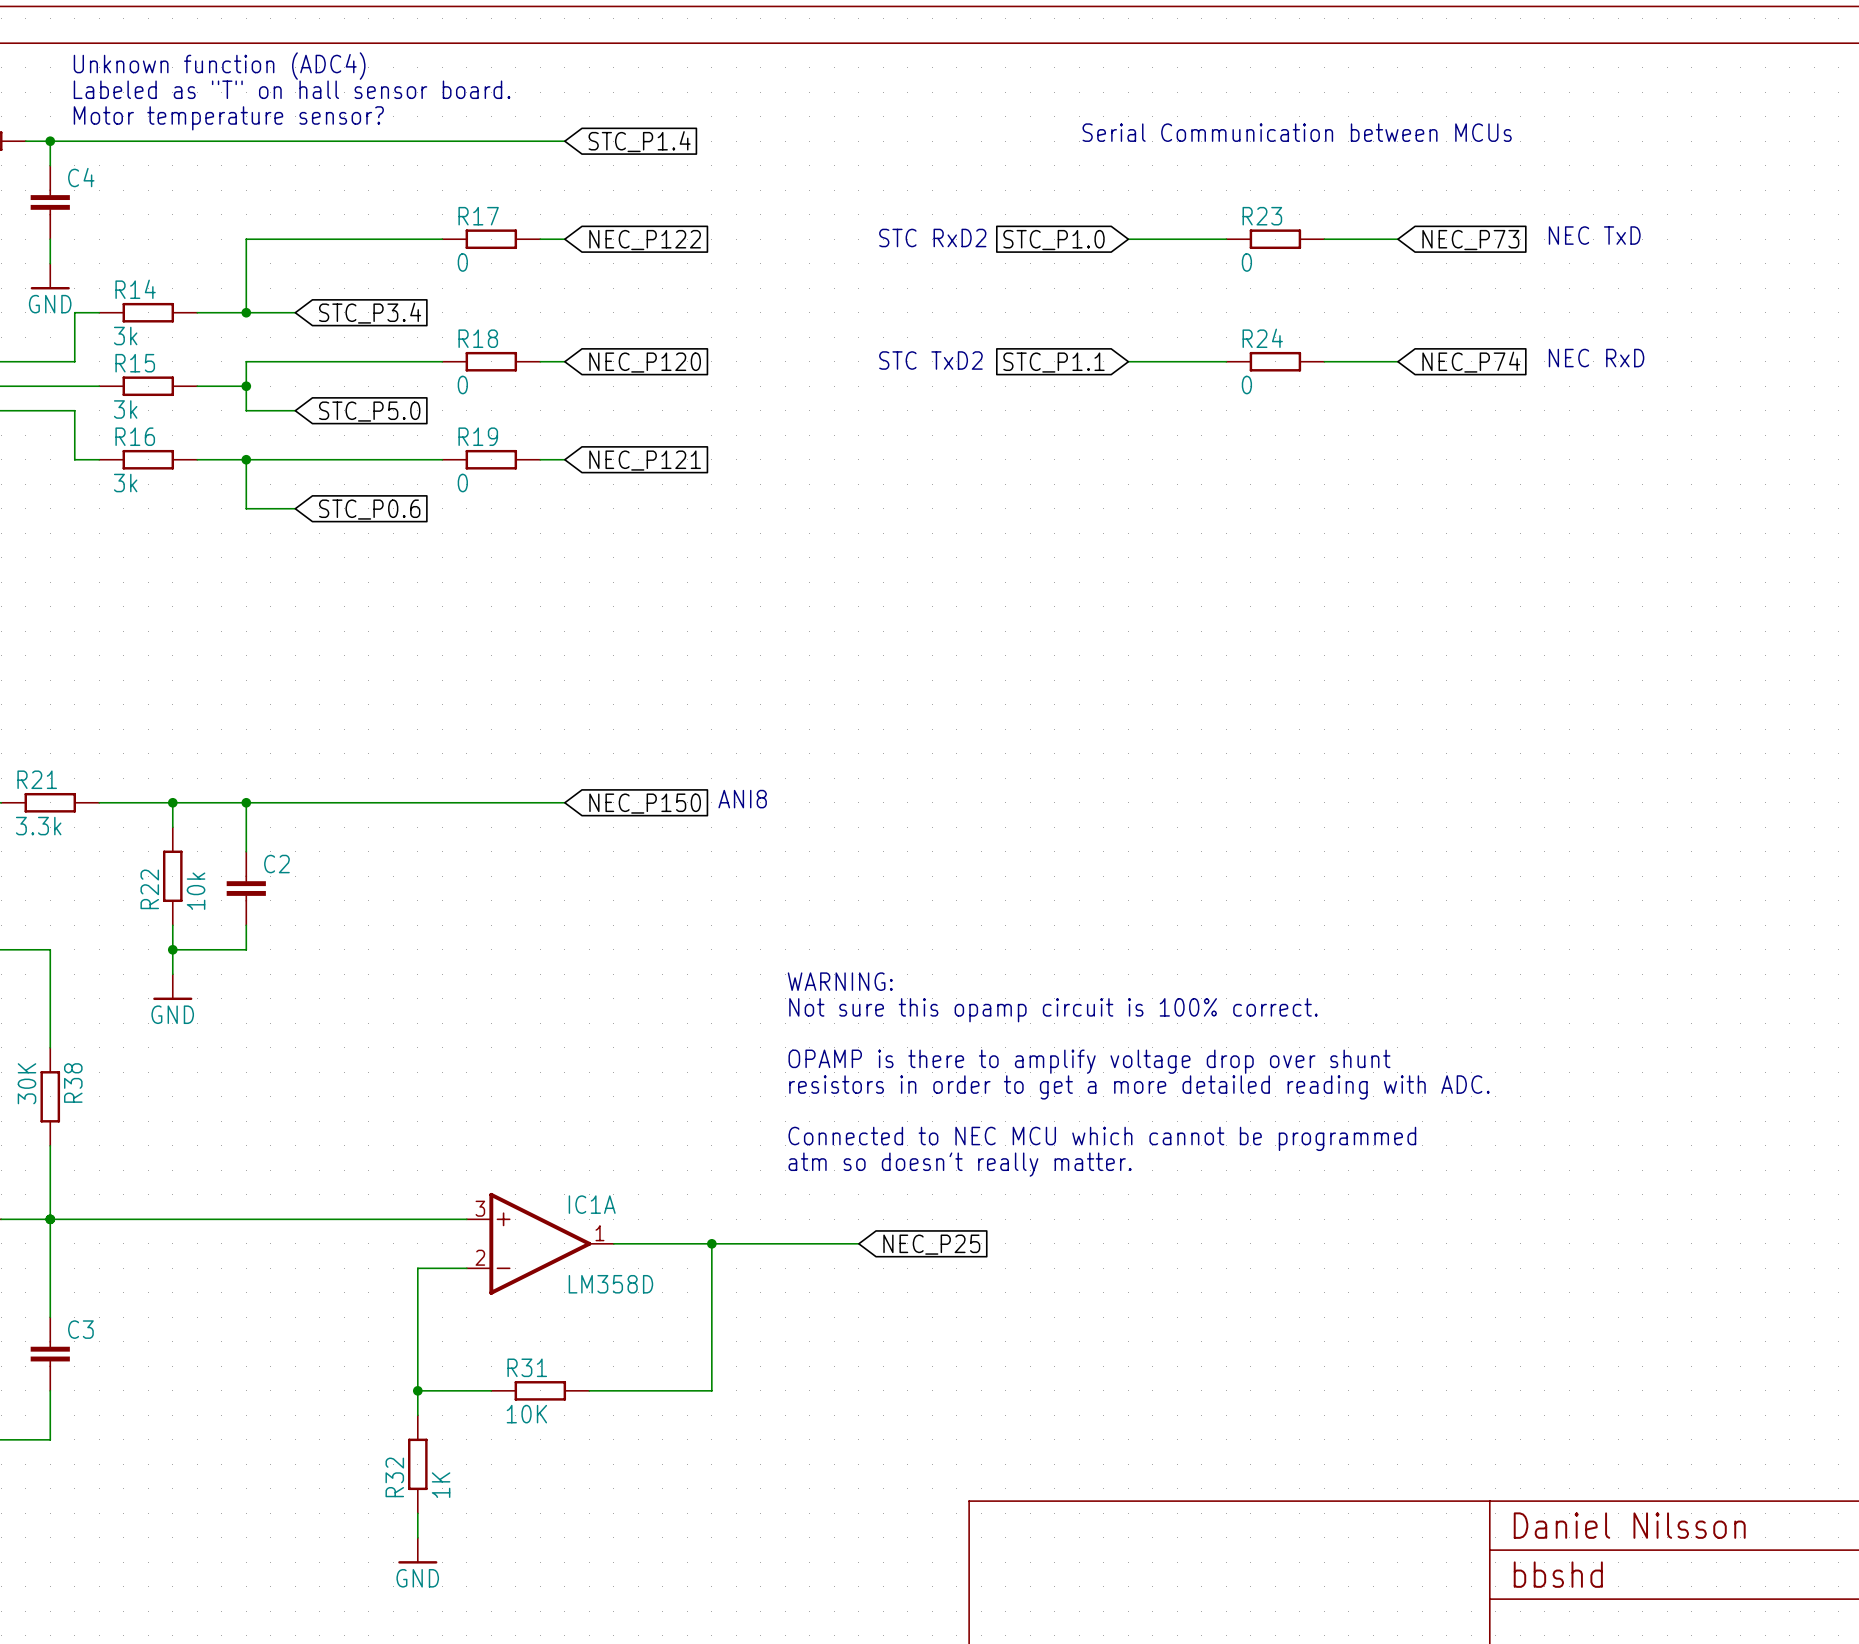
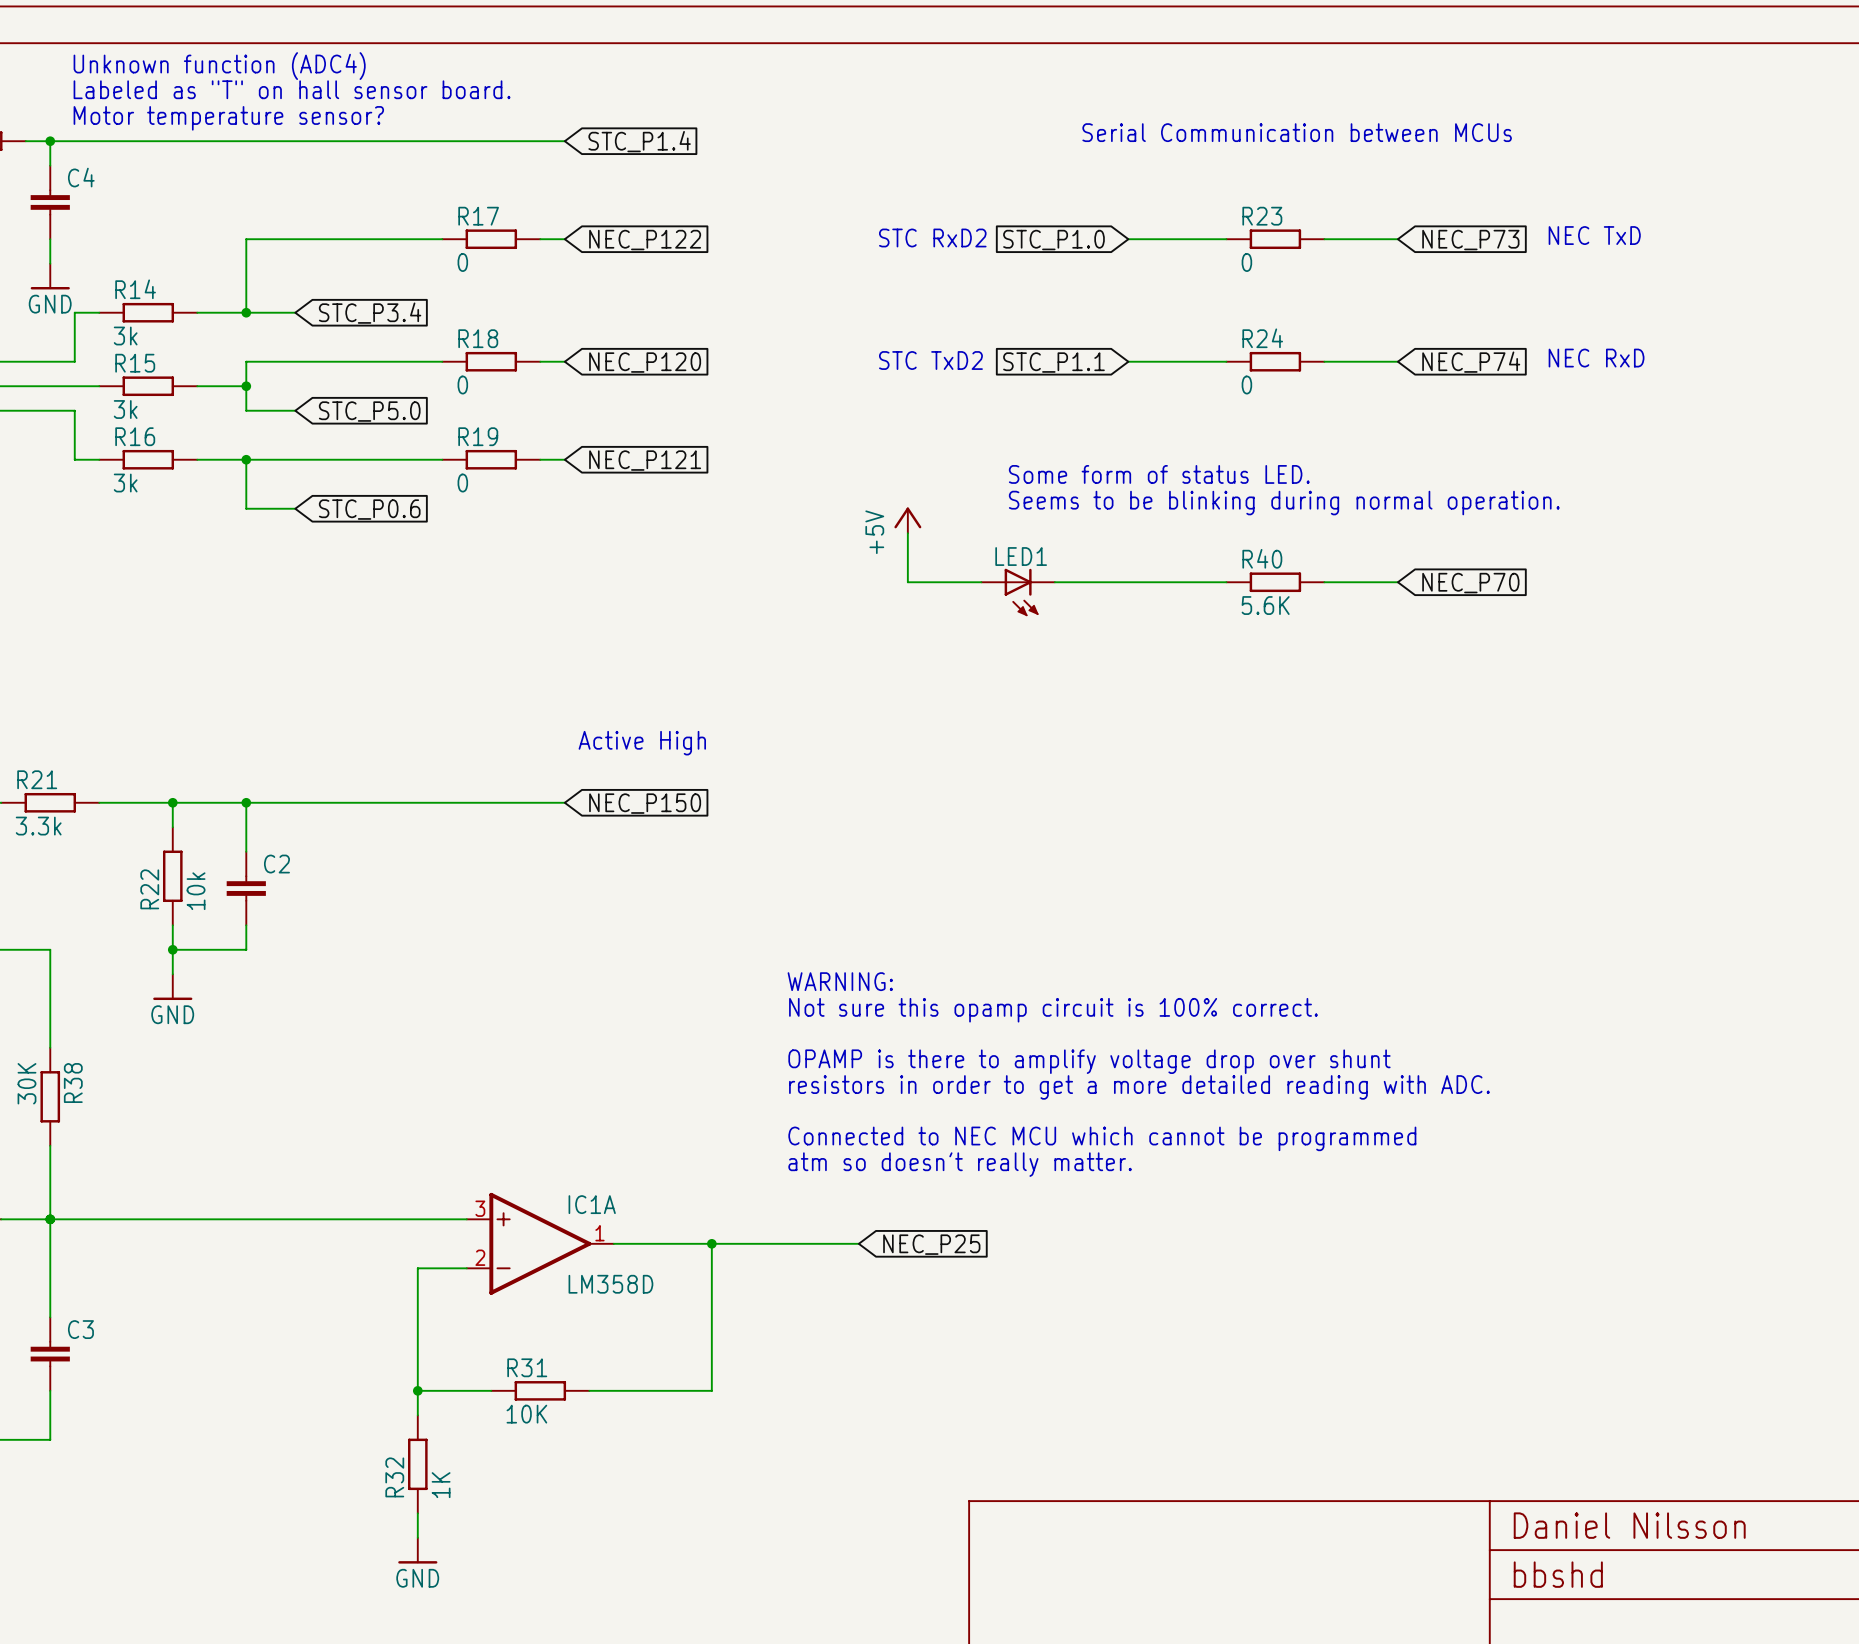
text: none -> Some form of status LED. (1159, 474)
text: none -> Seems to be blinking during normal operation. (1284, 503)
power symbol: none -> +5V (907, 520)
wire: none -> (907, 533) (907, 582) (981, 582)
wire: none -> (1054, 582) (1226, 582)
R40: none -> 5.6K (1275, 582)
wire: none -> (1324, 582) (1397, 582)
global label: none -> NEC_P70 (1470, 583)
LED1: none -> (1018, 592)
text: none -> Active High (642, 743)
text: ANI8 (742, 799) -> none

